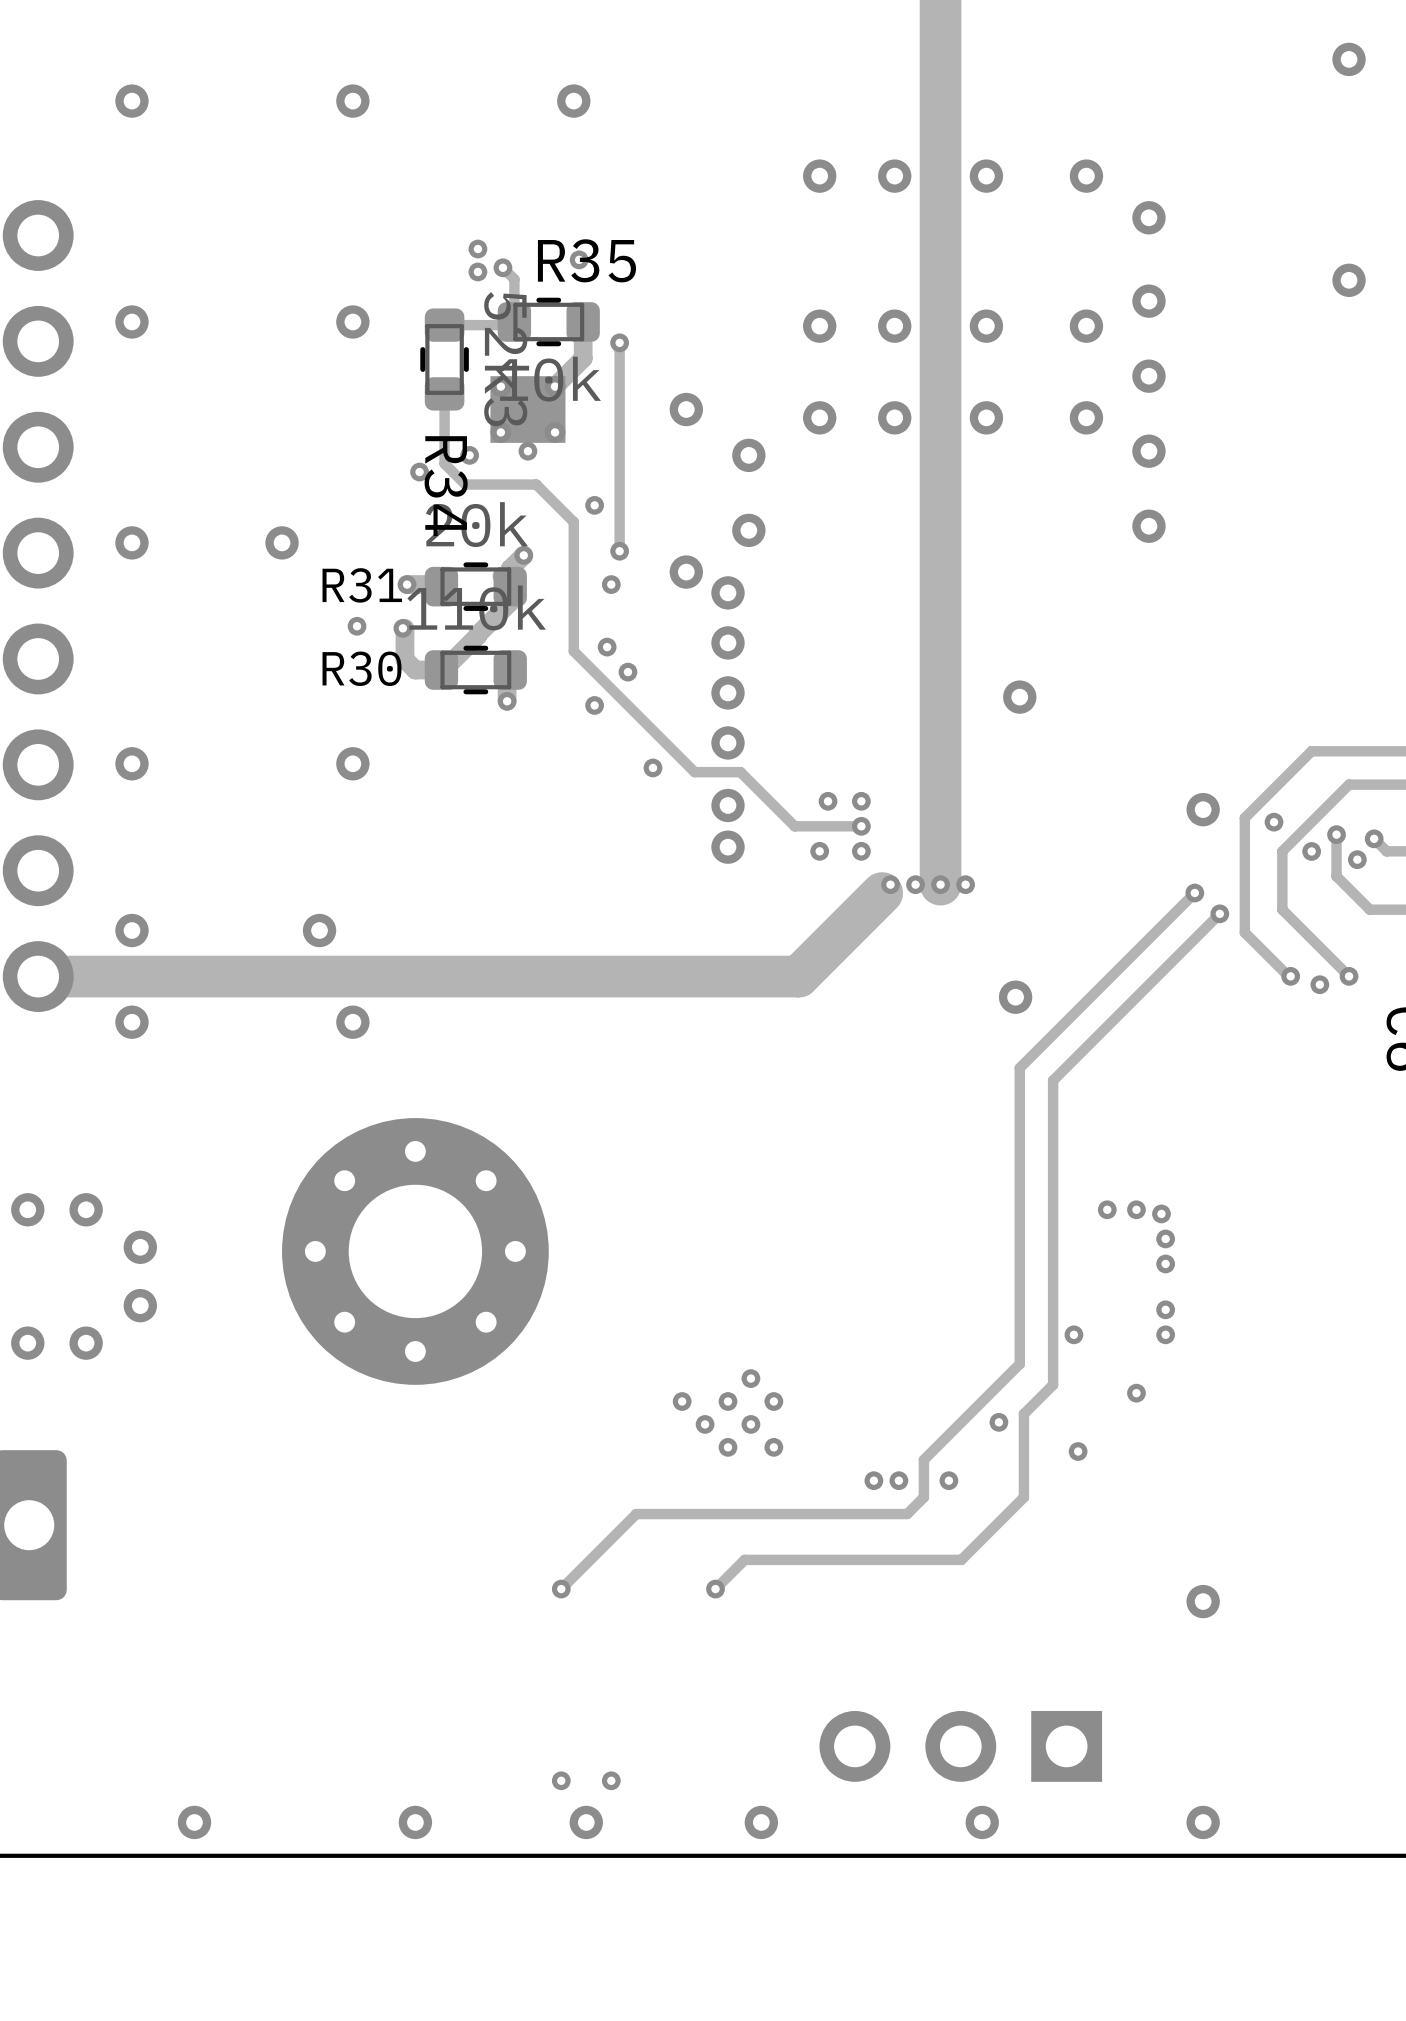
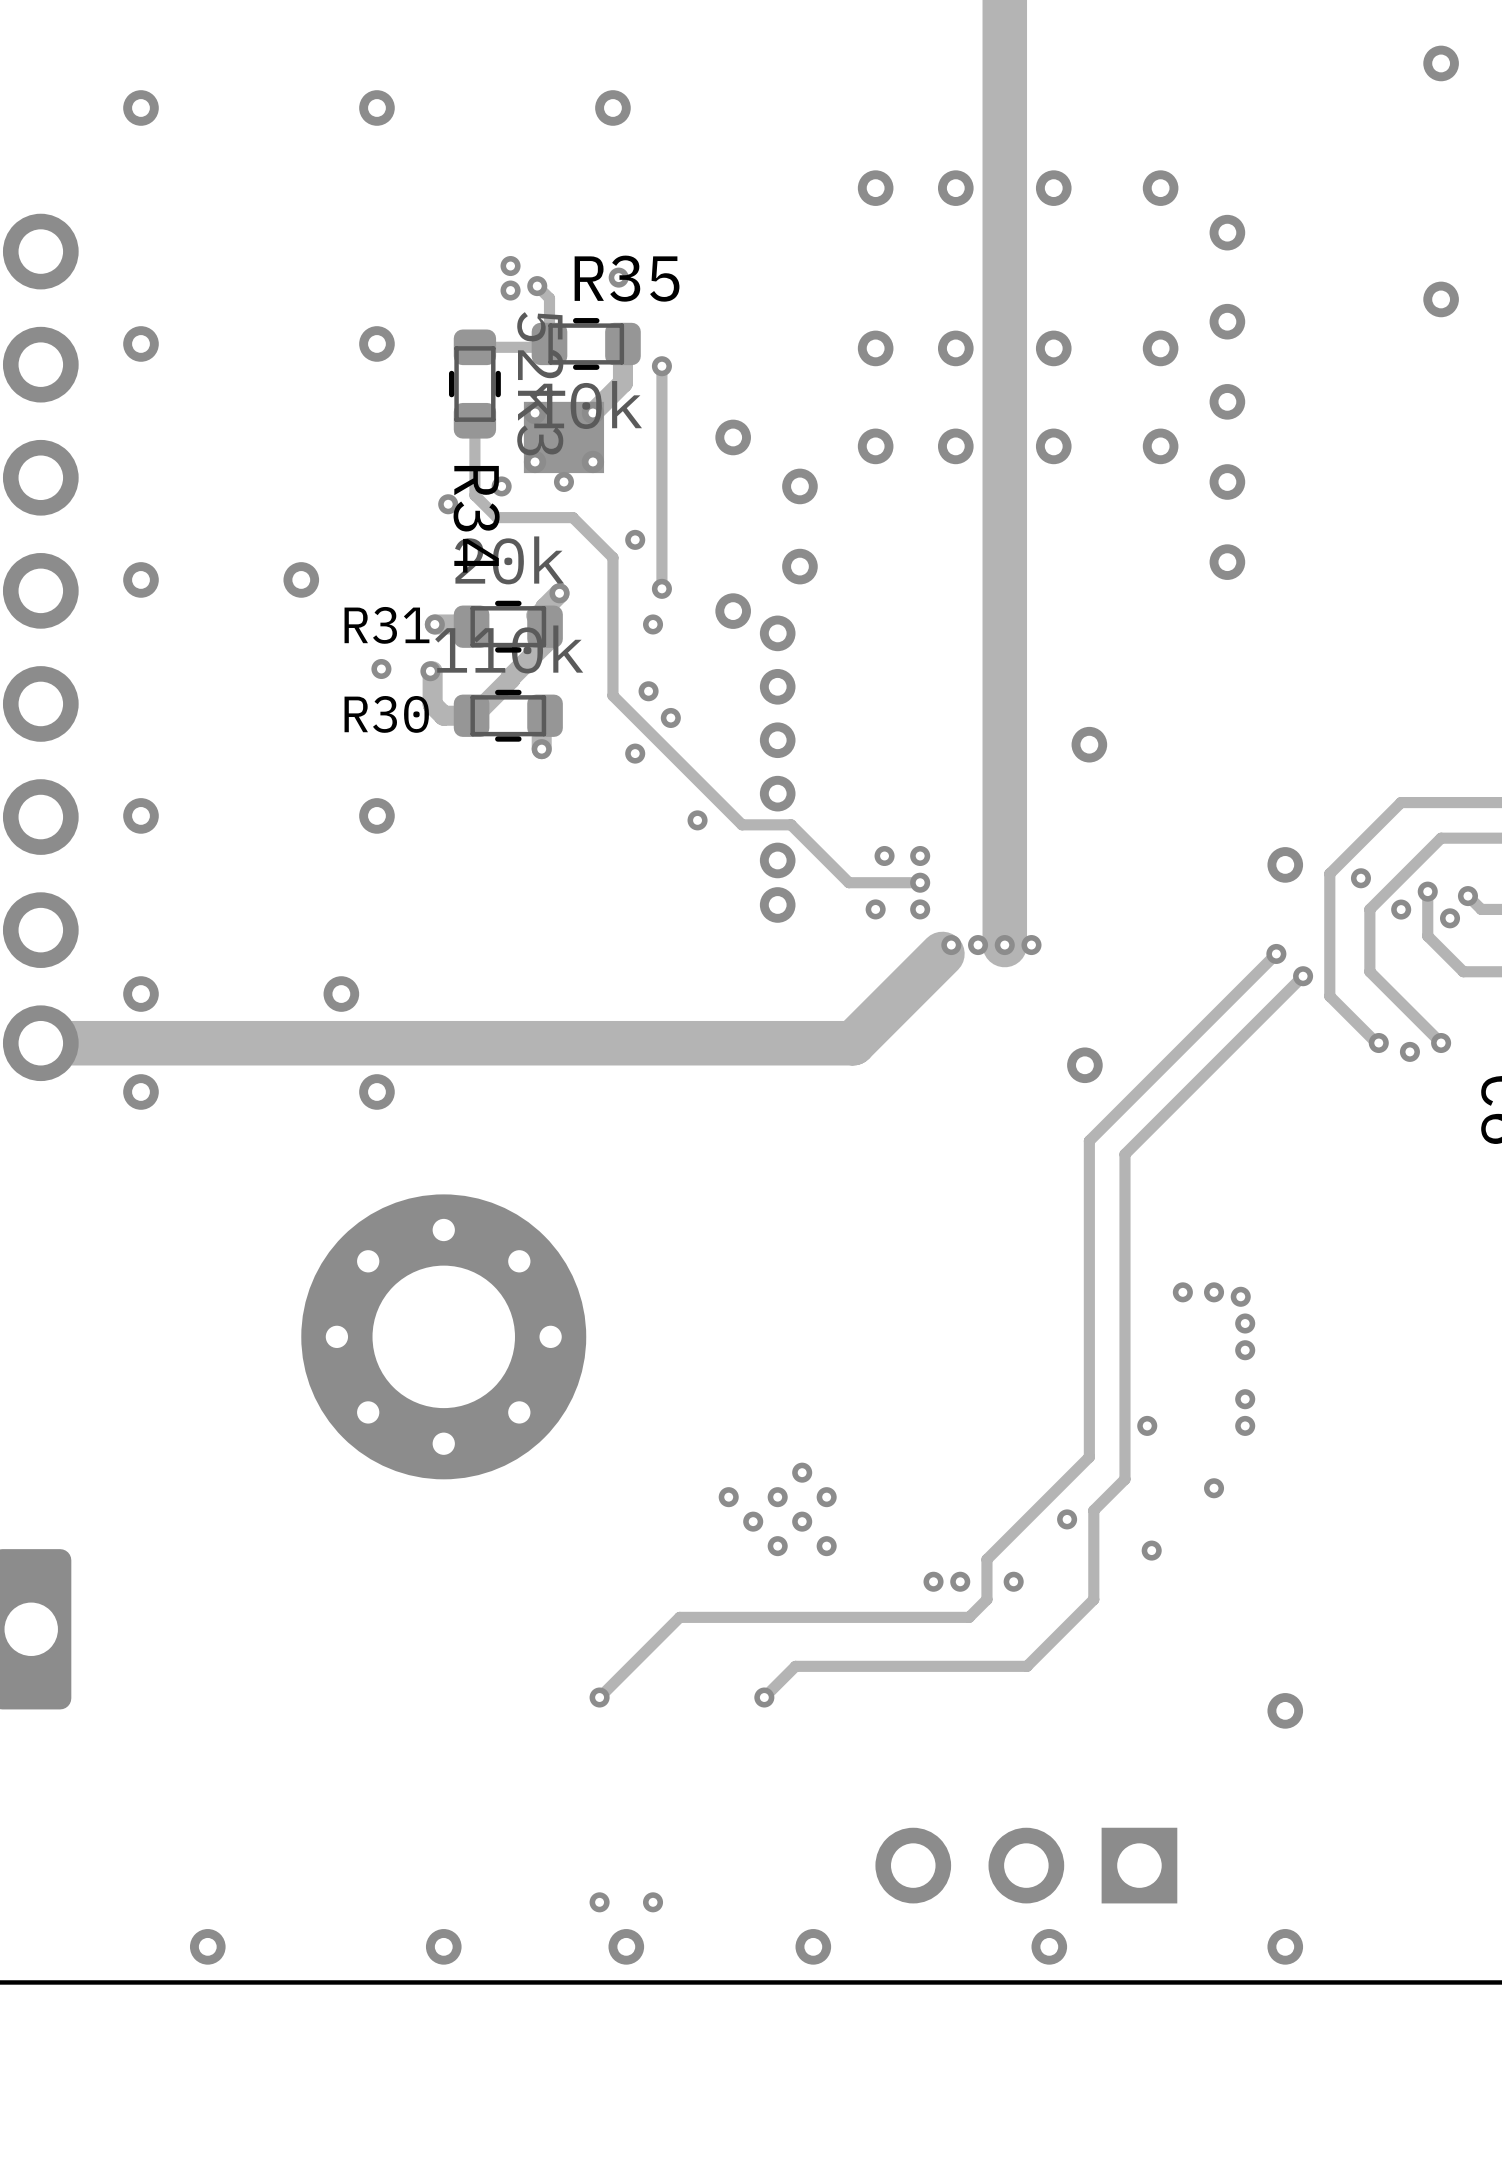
via: (27, 1209) -> none
via: (86, 1209) -> none
via: (140, 1247) -> none
via: (140, 1305) -> none
via: (27, 1343) -> none
via: (86, 1343) -> none

